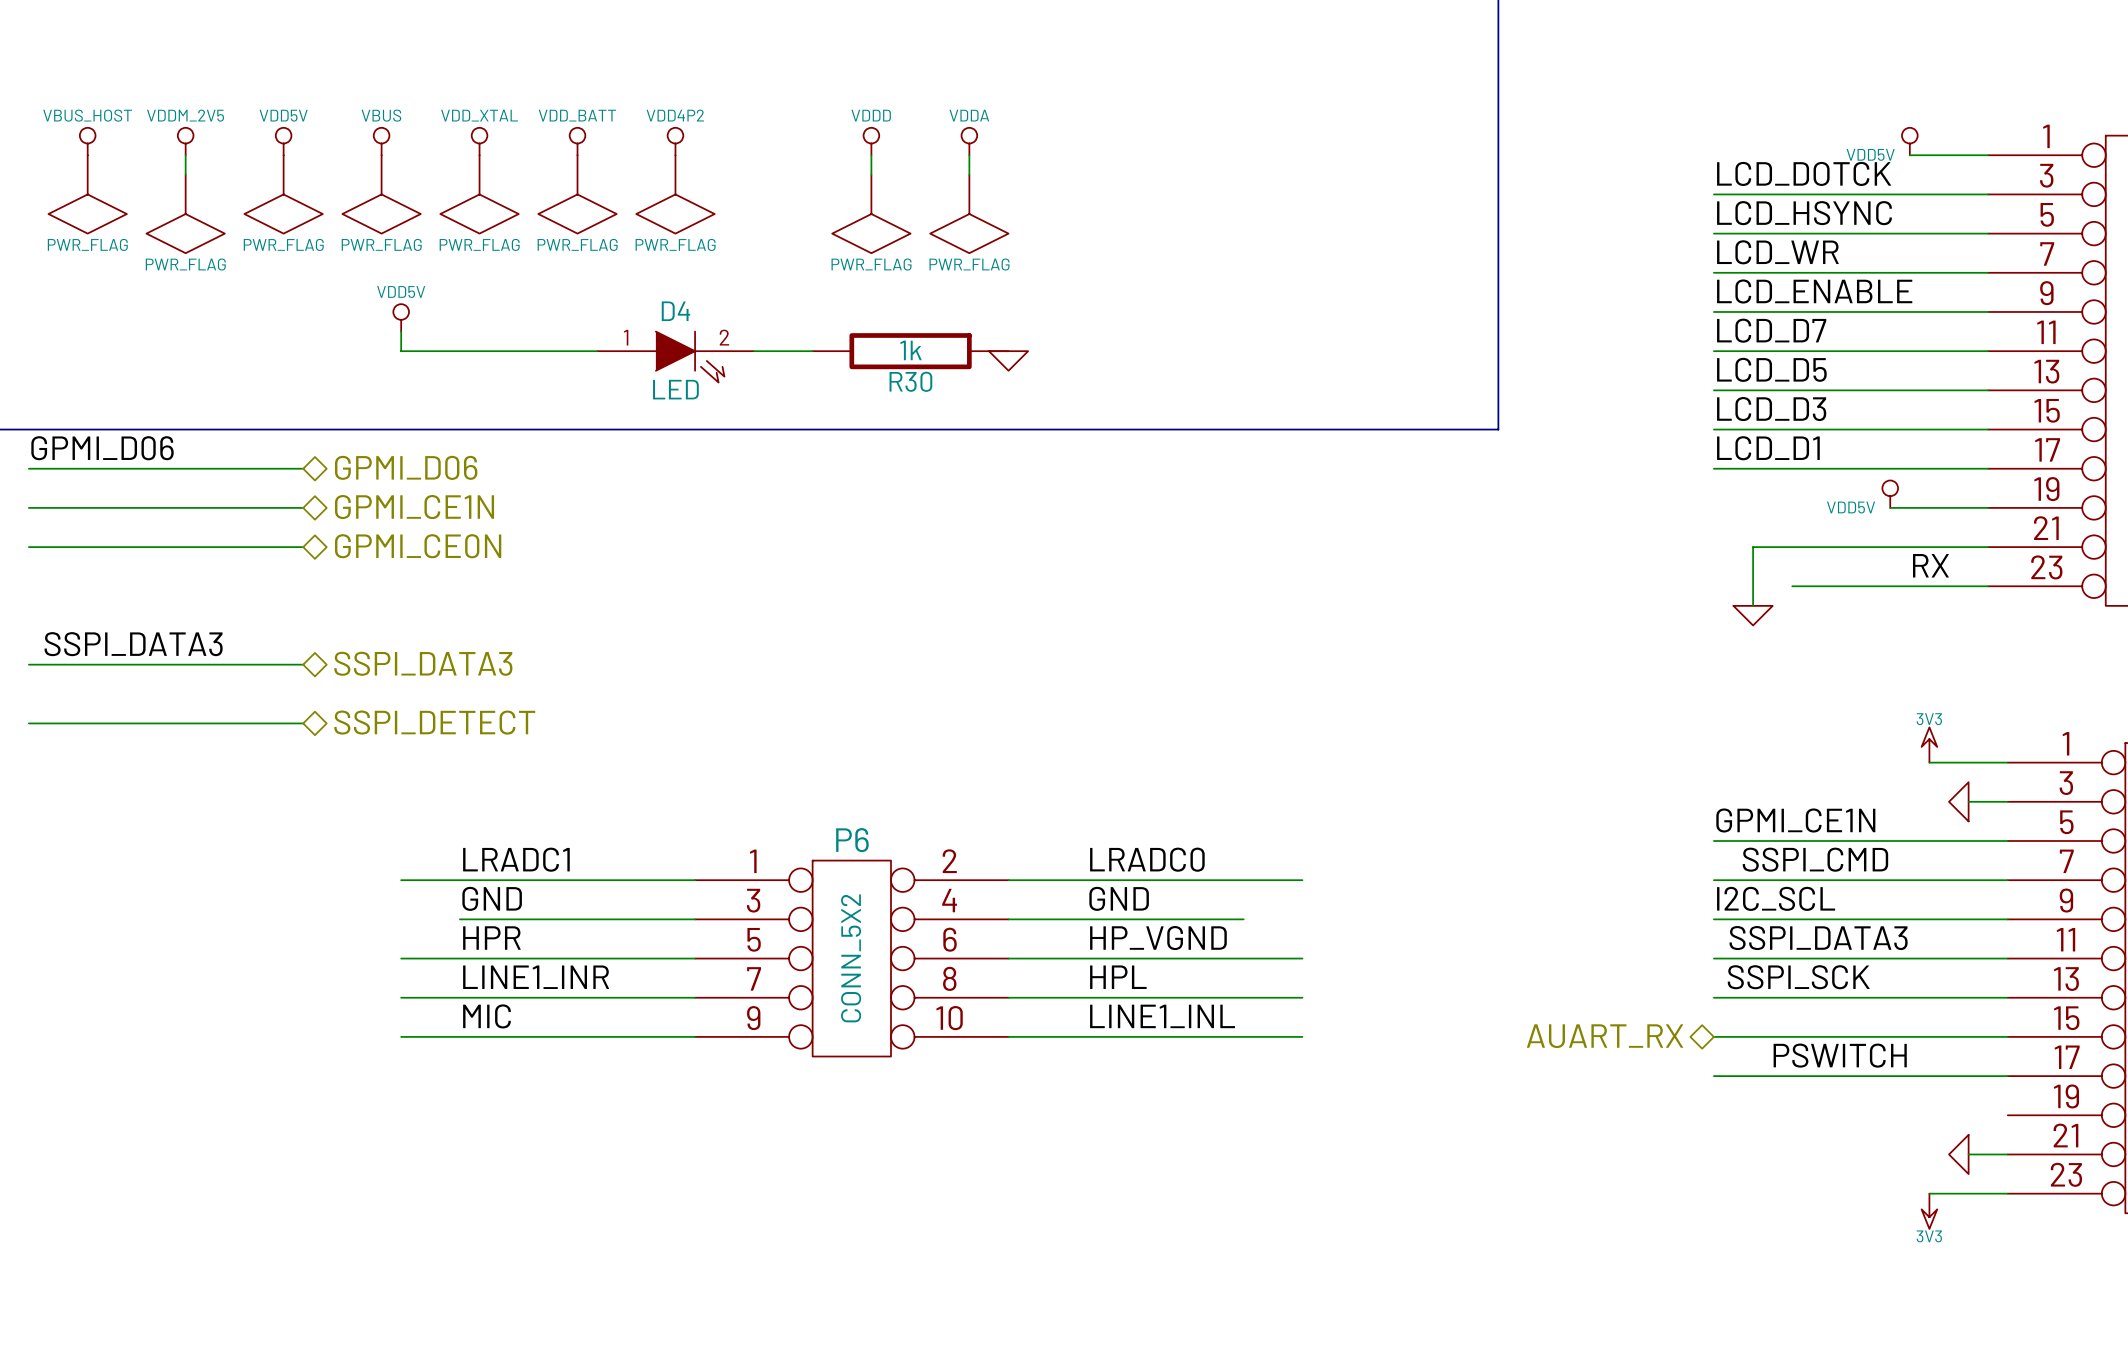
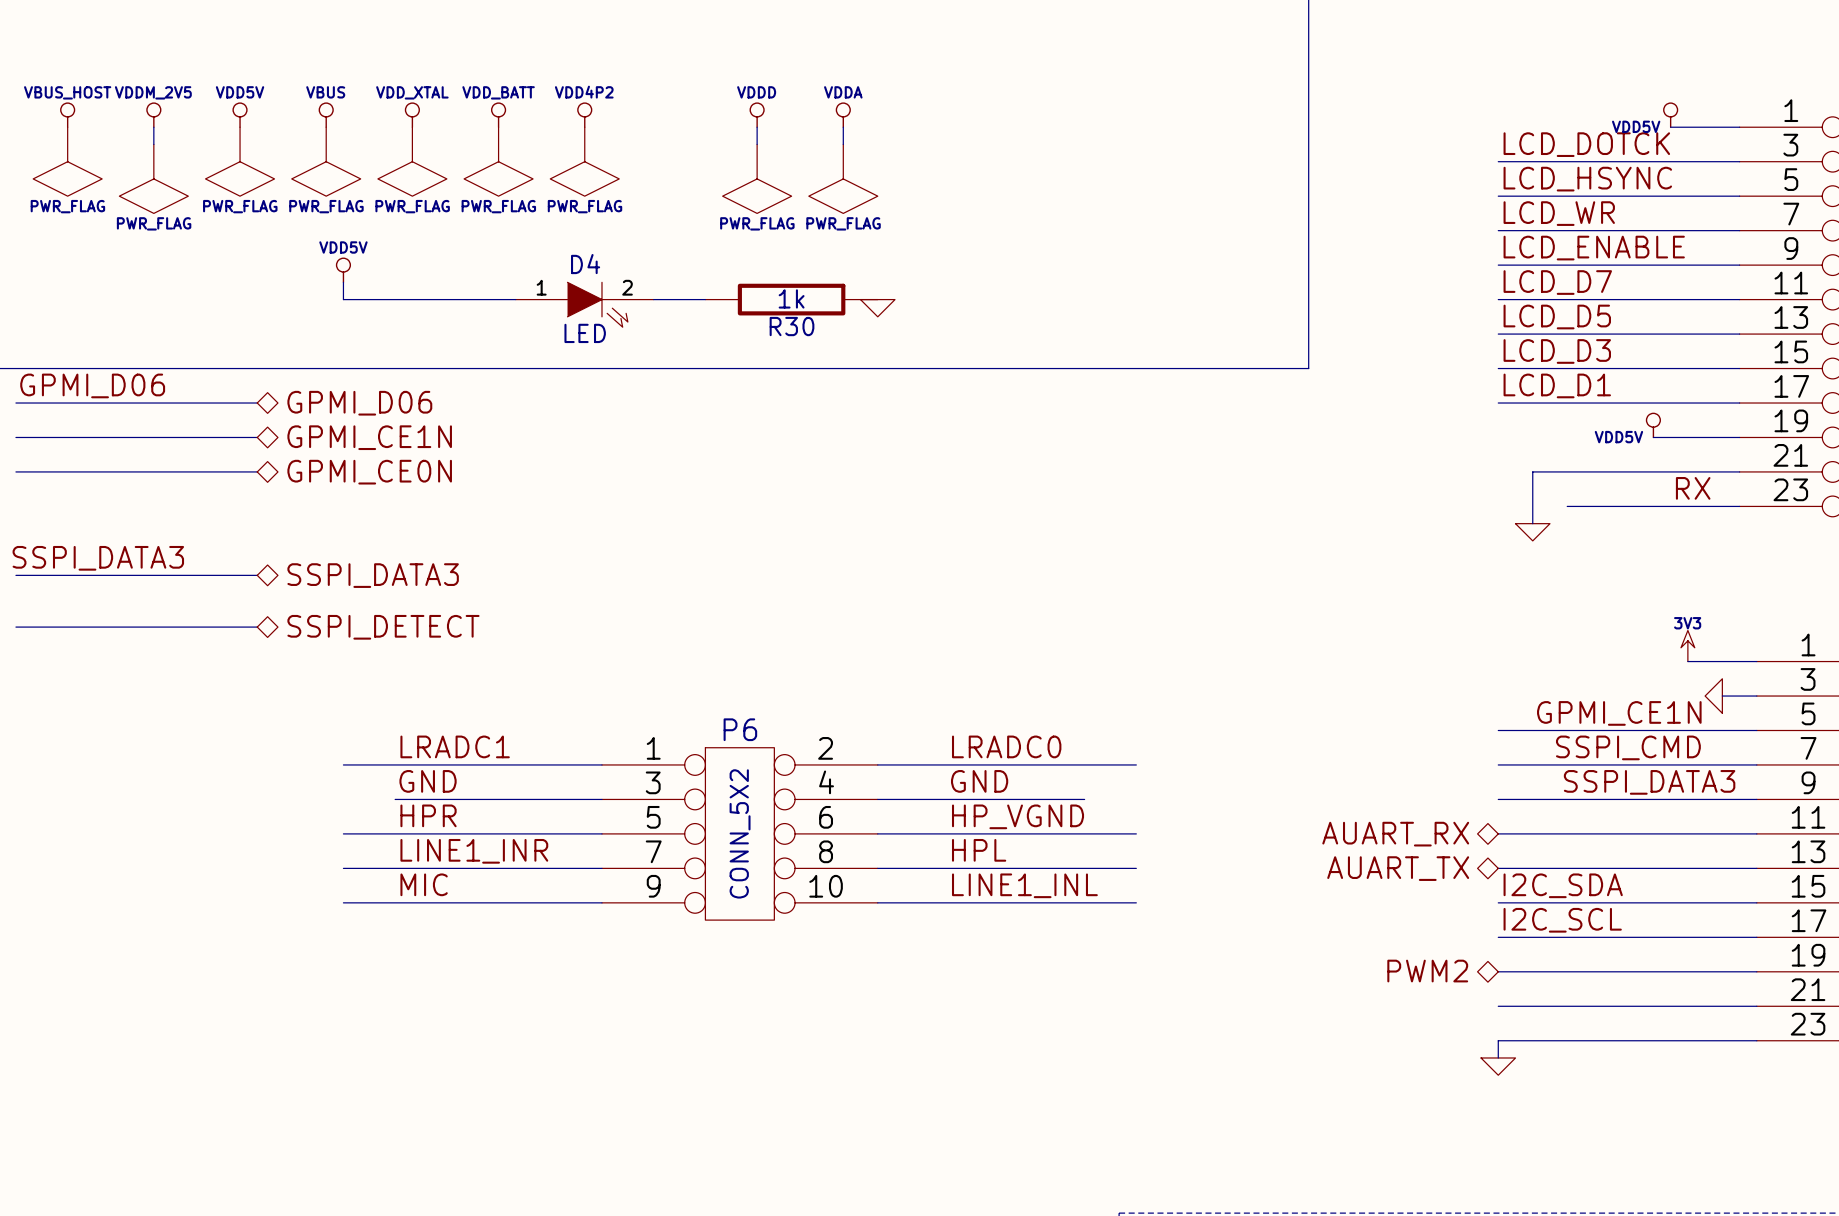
label position: GPMI_CE1N (1795, 820) -> GPMI_CE1N (1619, 713)
label position: SSPI_CMD (1815, 859) -> SSPI_CMD (1628, 747)
label position: I2C_SCL (1776, 898) -> I2C_SCL (1562, 920)
label position: SSPI_DATA3 (1818, 938) -> SSPI_DATA3 (1649, 782)
label: SSPI_SCK (1798, 977) -> none
hierarchical label: none -> AUART_TX (1398, 868)
label: none -> I2C_SDA (1563, 885)
hierarchical label position: AUART_RX (1605, 1036) -> AUART_RX (1395, 834)
label: PSWITCH (1840, 1055) -> none
hierarchical label: none -> PWM2 (1427, 971)
wire: none -> (1498, 971) (1756, 971)
wire: none -> (1498, 1006) (1722, 1006)
power symbol rotation: 0° (1958, 1154) -> 90° counterclockwise (1498, 1066)
power symbol position: (1958, 1154) -> (1498, 1066)
wire: none -> (1687, 1040) (1498, 1040) (1498, 1057)
power symbol: 3V3 (1929, 1211) -> none

